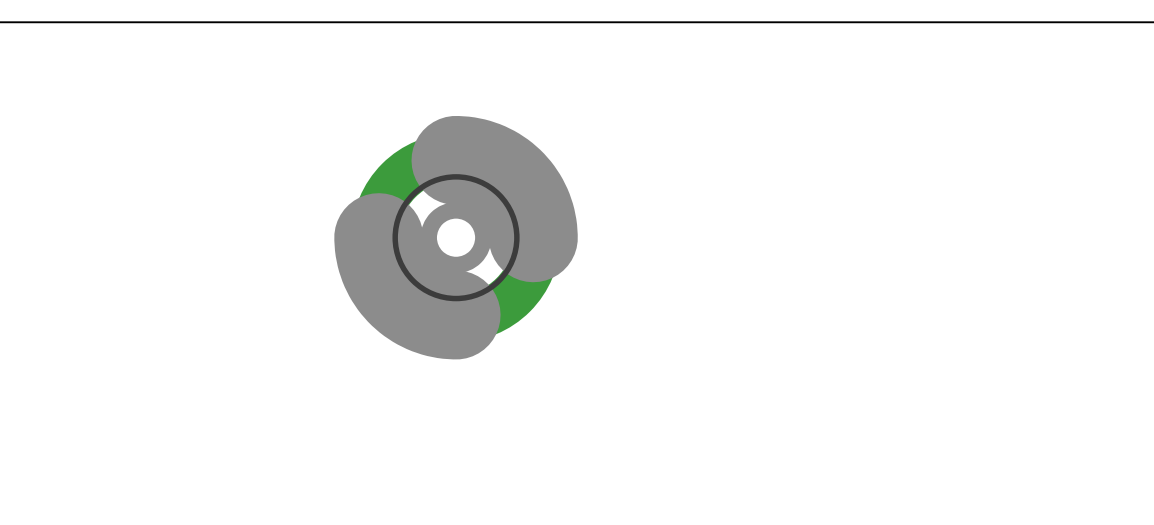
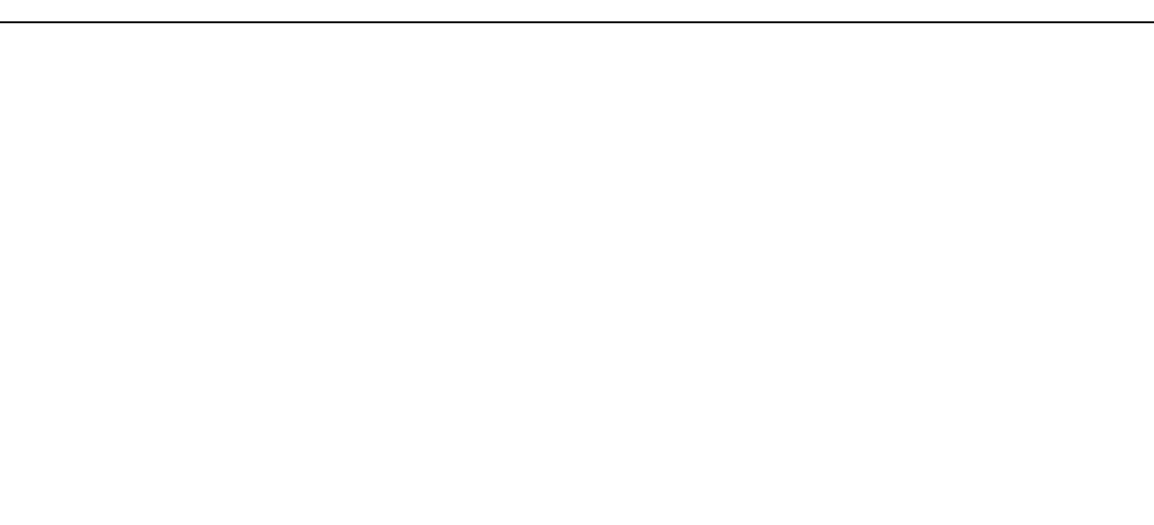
part: (456, 237) -> none

